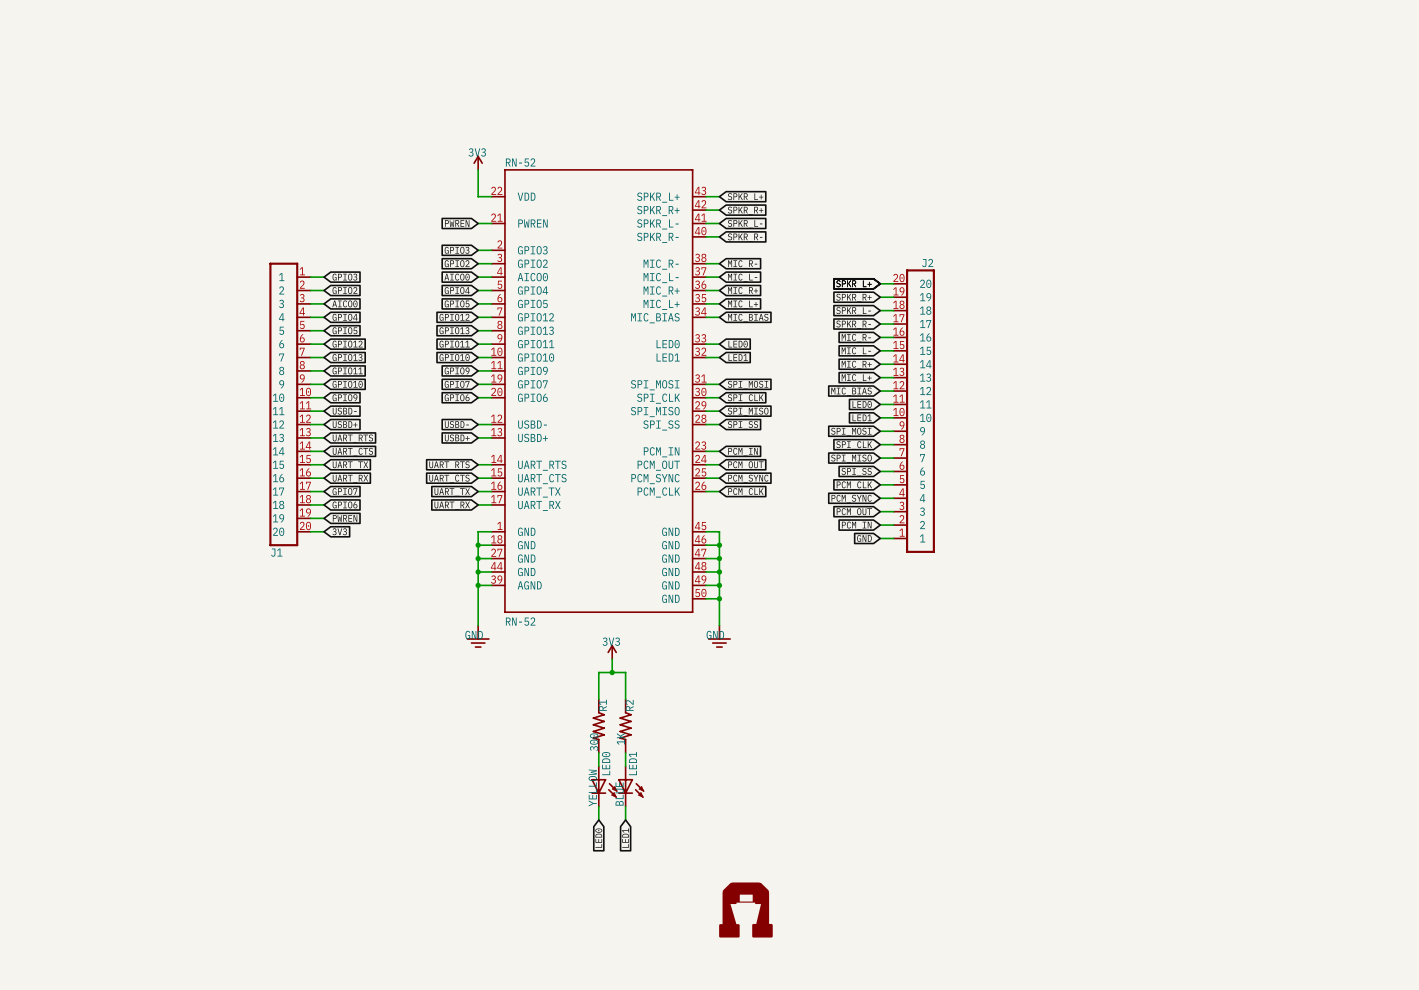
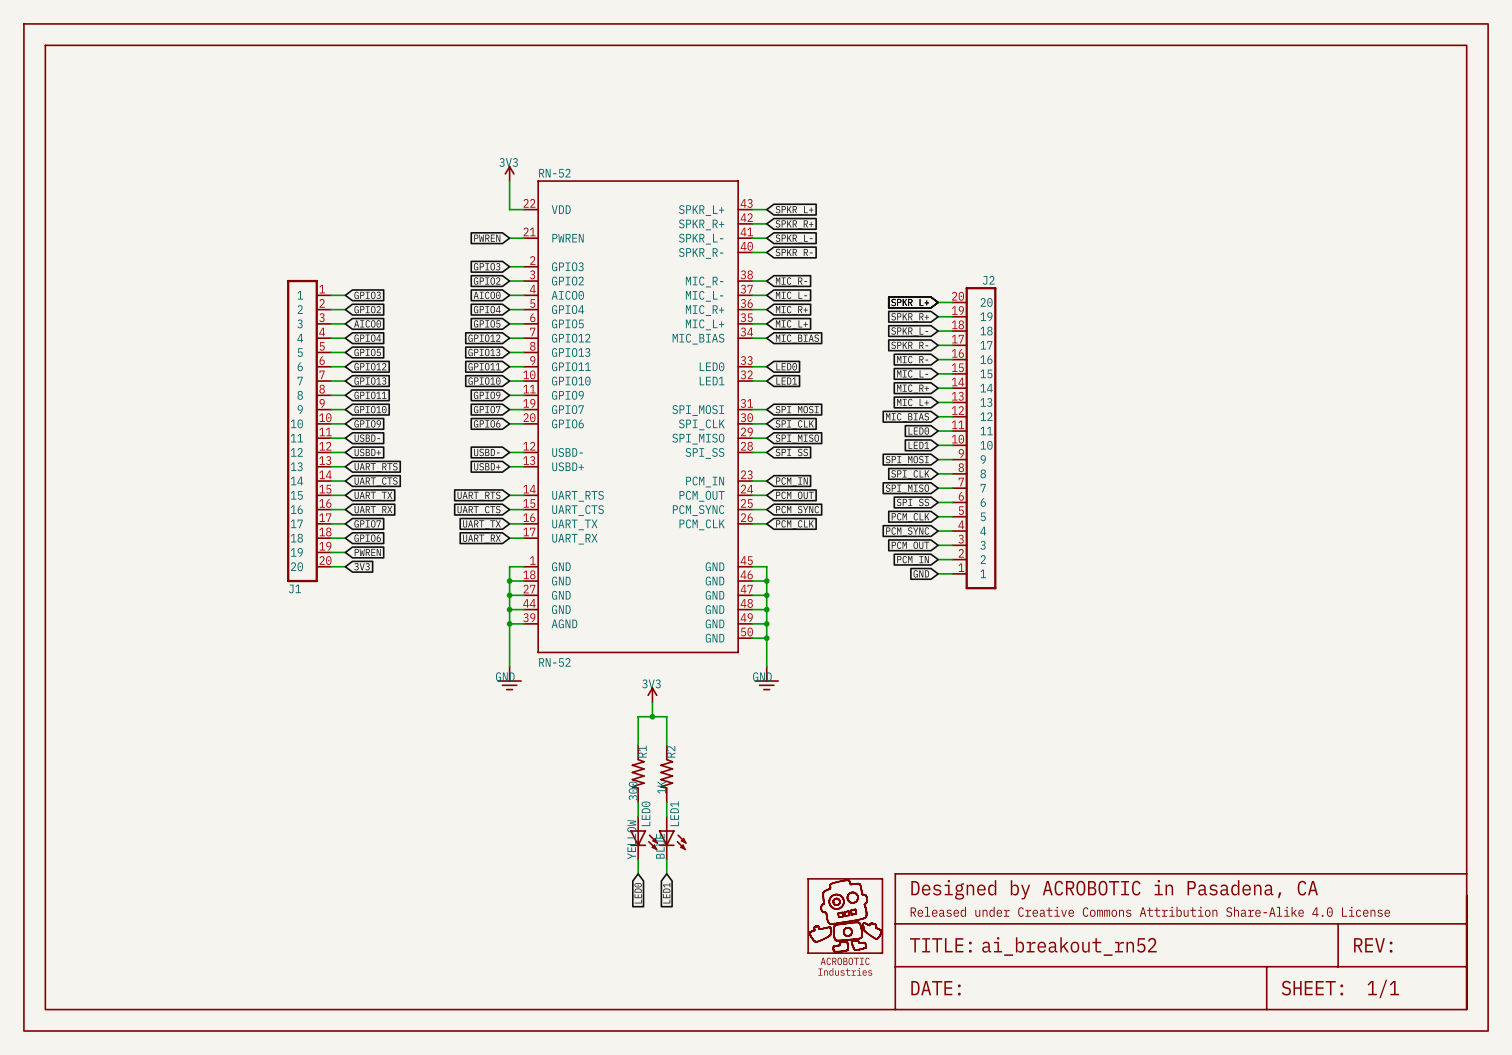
part: none -> (756, 527)
part: none -> (845, 916)
part: none -> (1180, 941)
part: (745, 910) -> none

